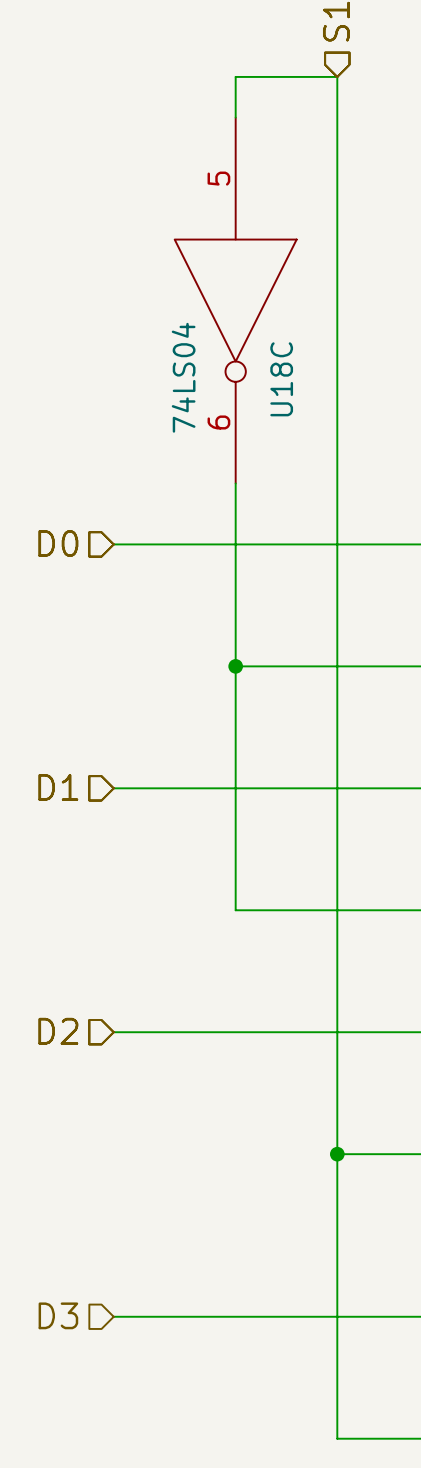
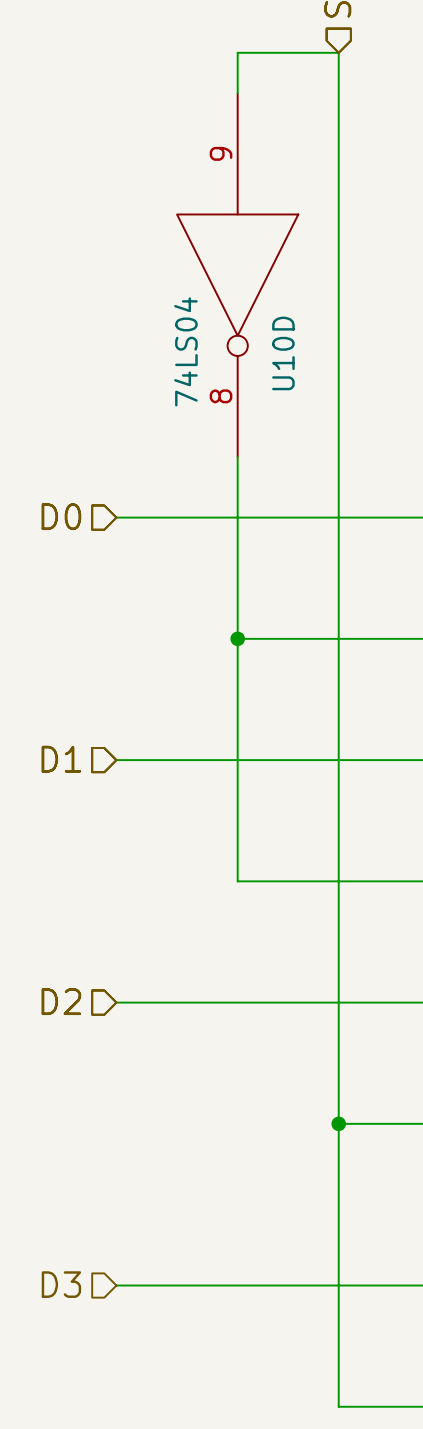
U18C pin number: 5 (218, 178) -> 9 (221, 153)
U18C name: U18C (281, 379) -> U10D (283, 353)
U18C pin number: 6 (218, 422) -> 8 (221, 396)

